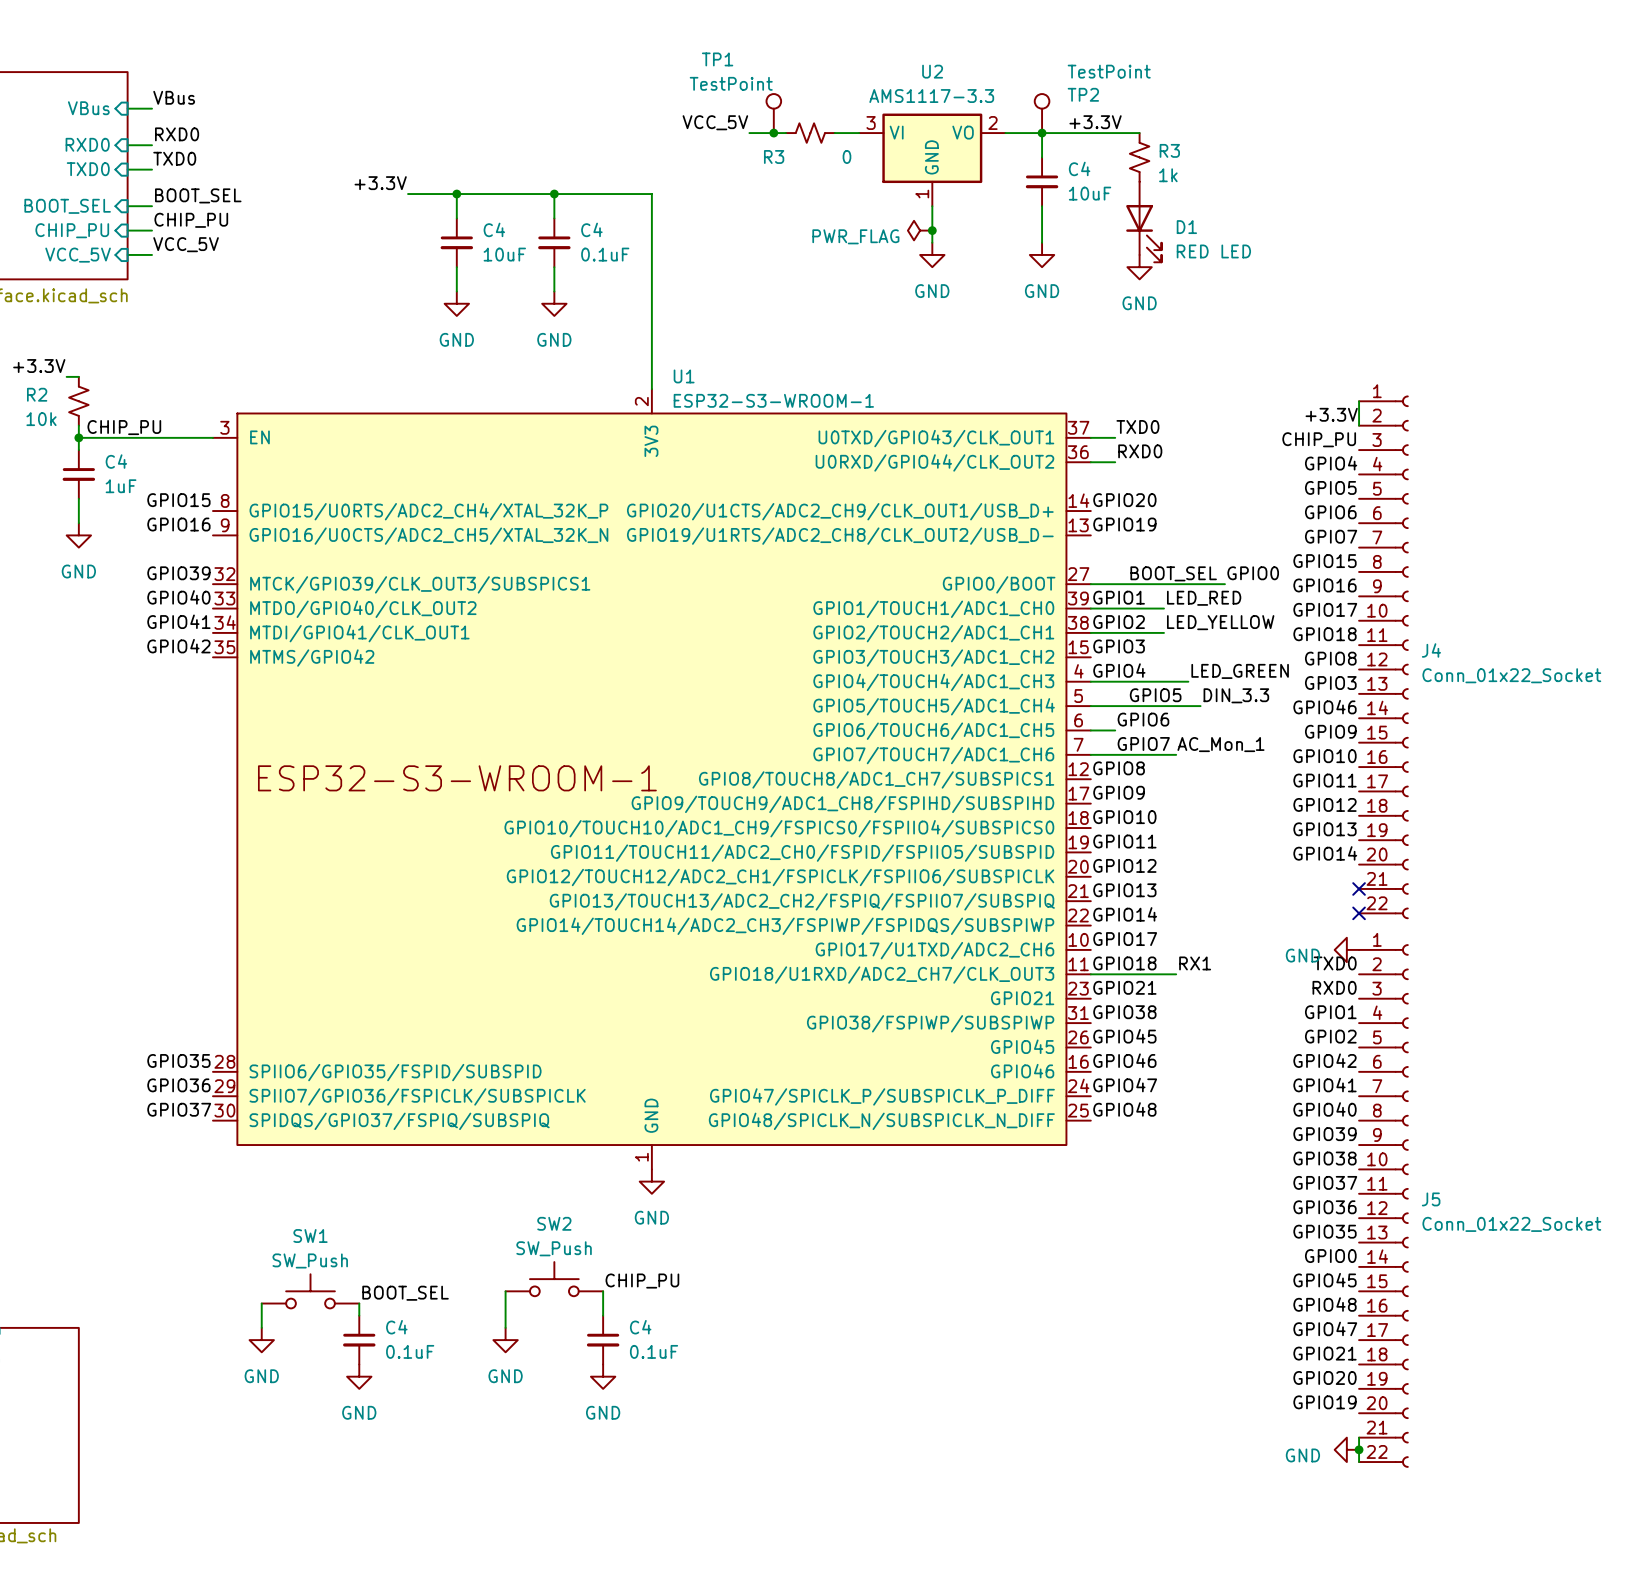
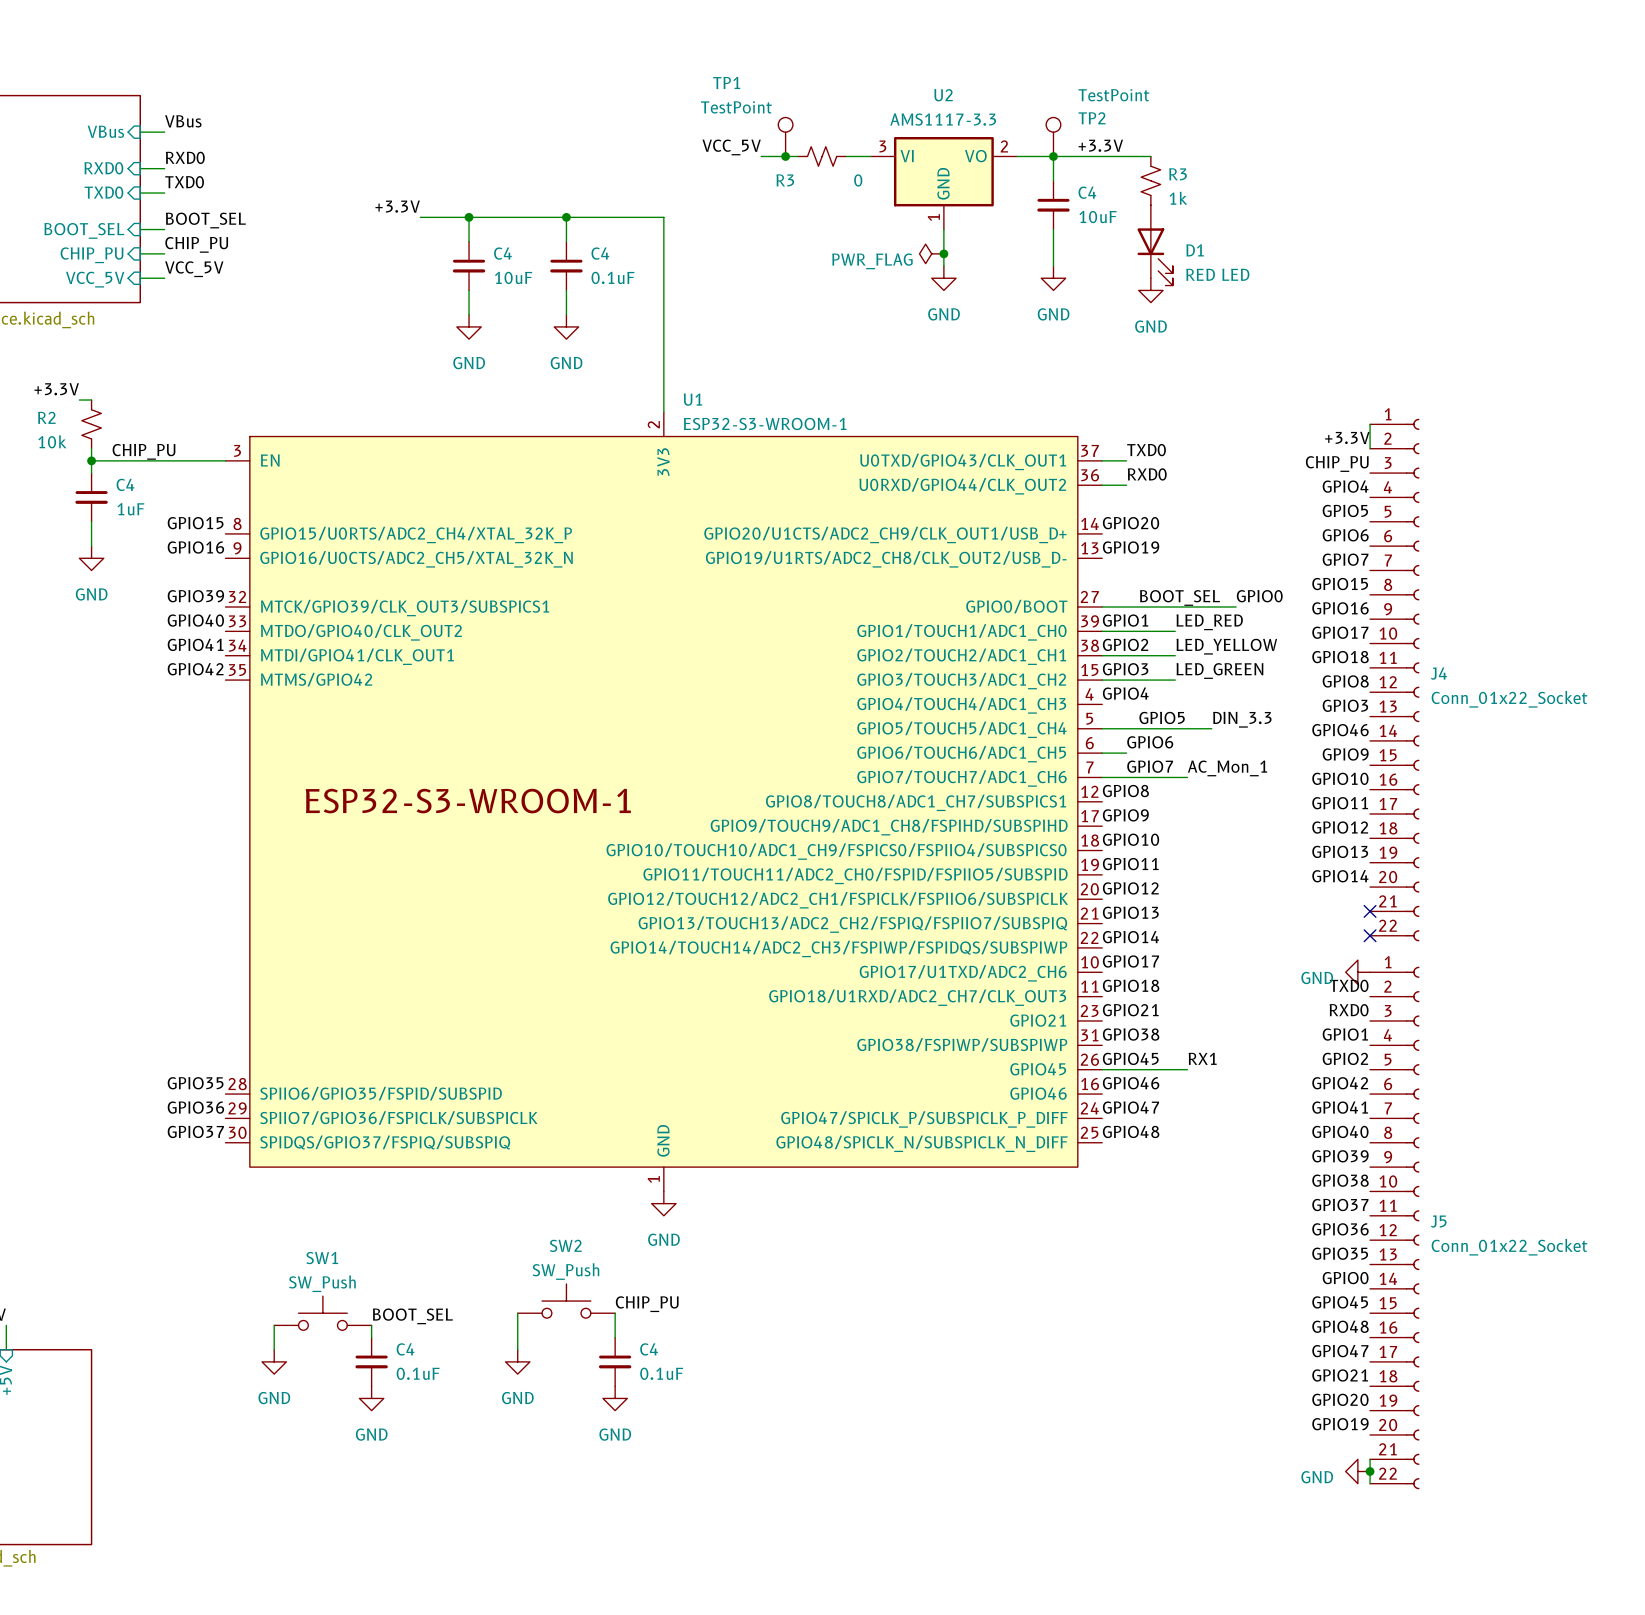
wire: none -> (1102, 680) (1175, 680)
label position: LED_GREEN (1240, 671) -> LED_GREEN (1219, 671)
wire: (1090, 681) (1188, 681) -> none
label position: RX1 (1195, 963) -> RX1 (1202, 1058)
wire: (1090, 974) (1176, 974) -> (1102, 1069) (1187, 1069)

